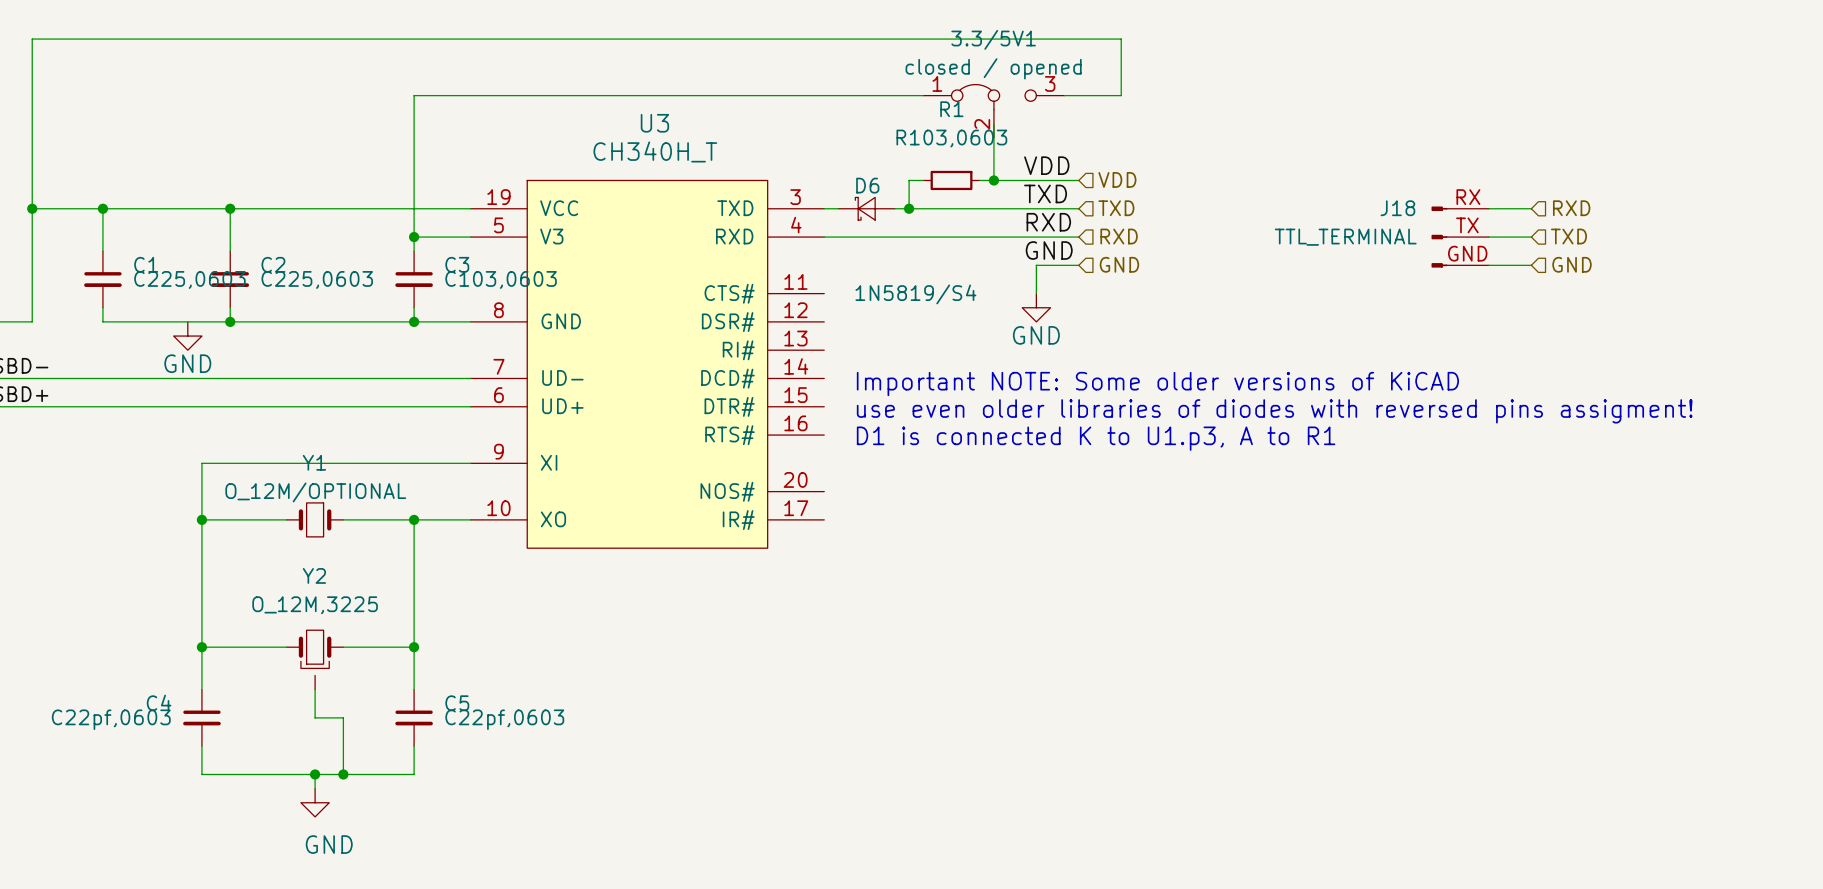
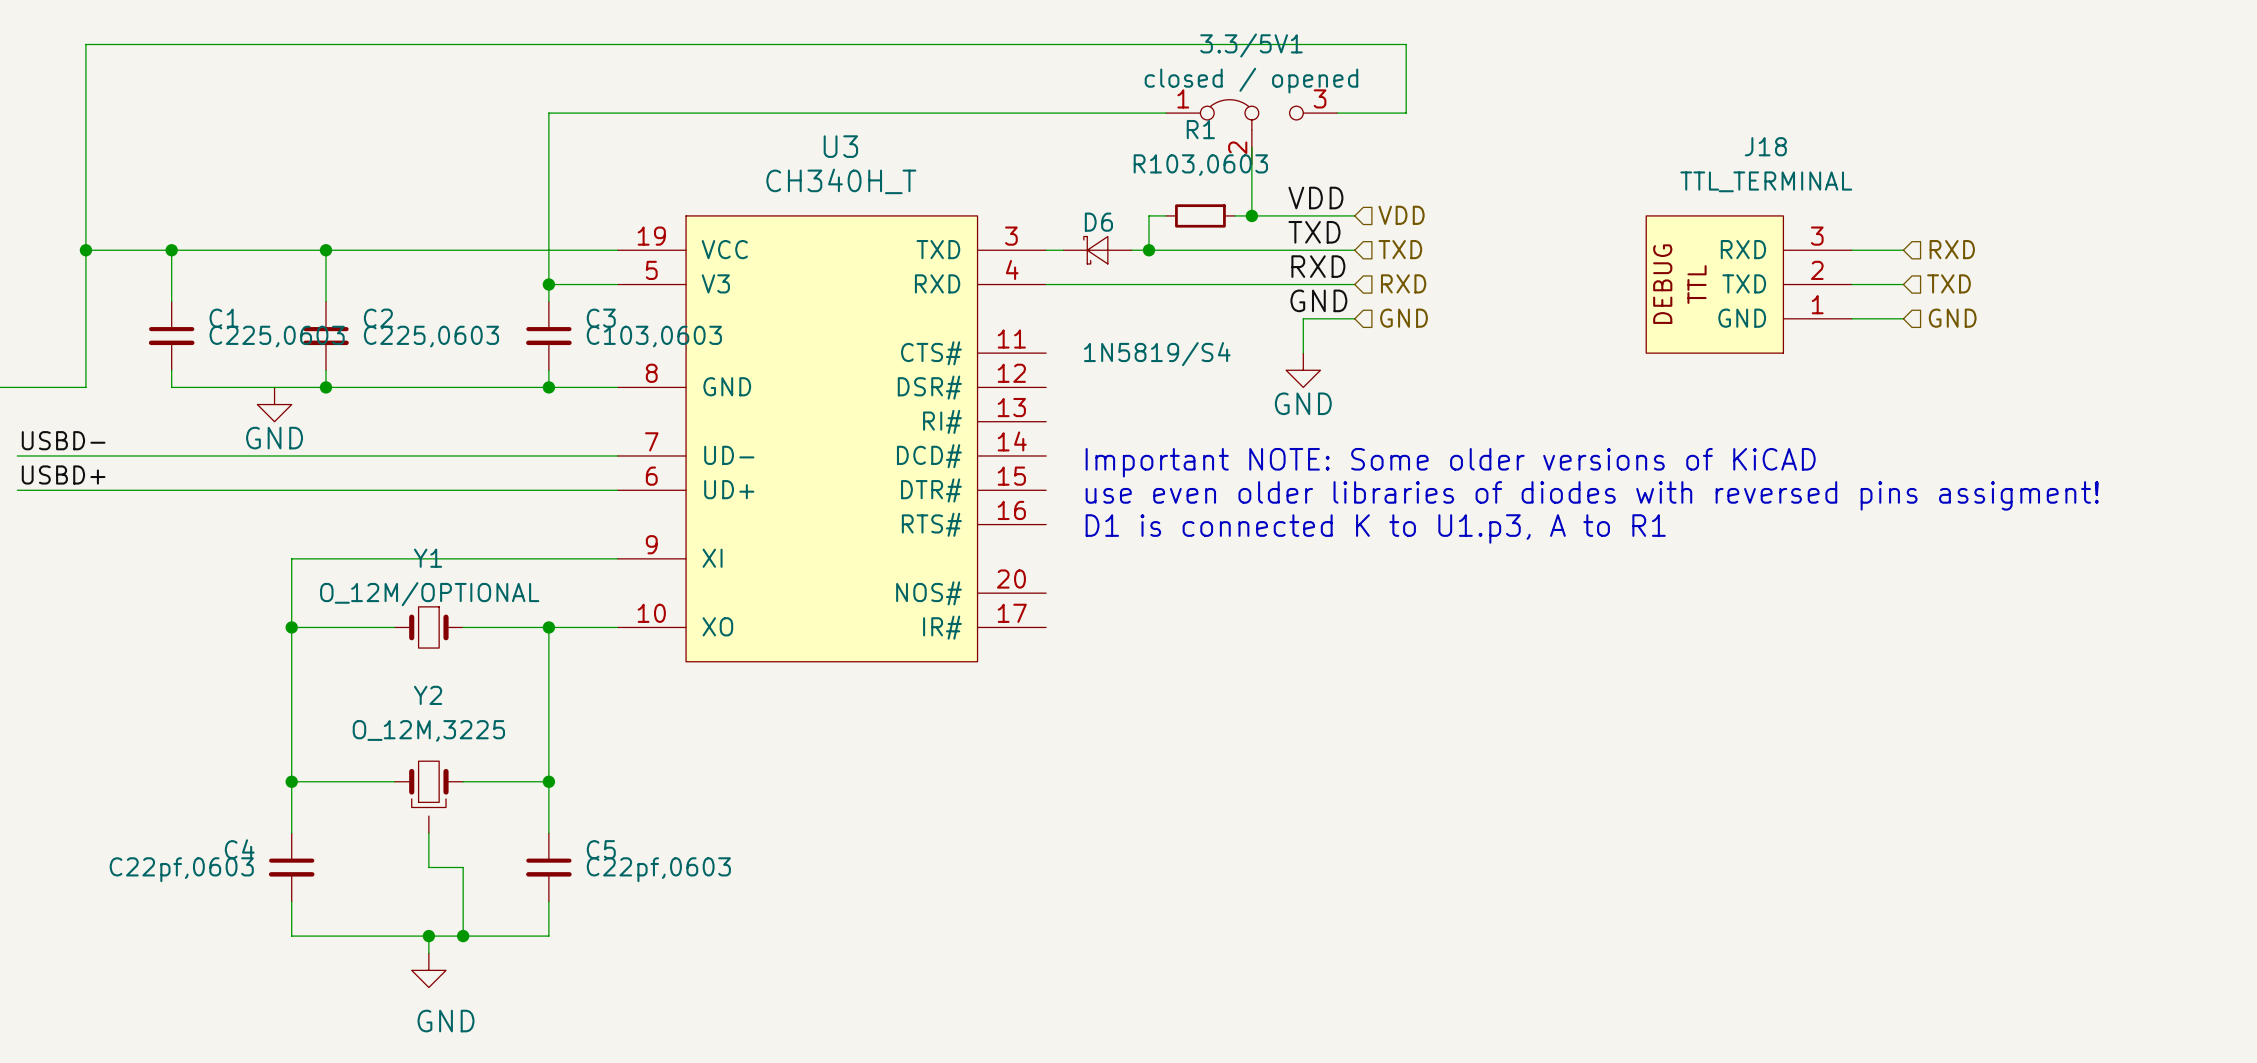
J18 symbol: [1431, 206, 1489, 268] -> [1646, 215, 1852, 354]
J18 name position: J18 (1397, 208) -> J18 (1765, 146)
J18 value position: TTL_TERMINAL (1345, 237) -> TTL_TERMINAL (1766, 181)

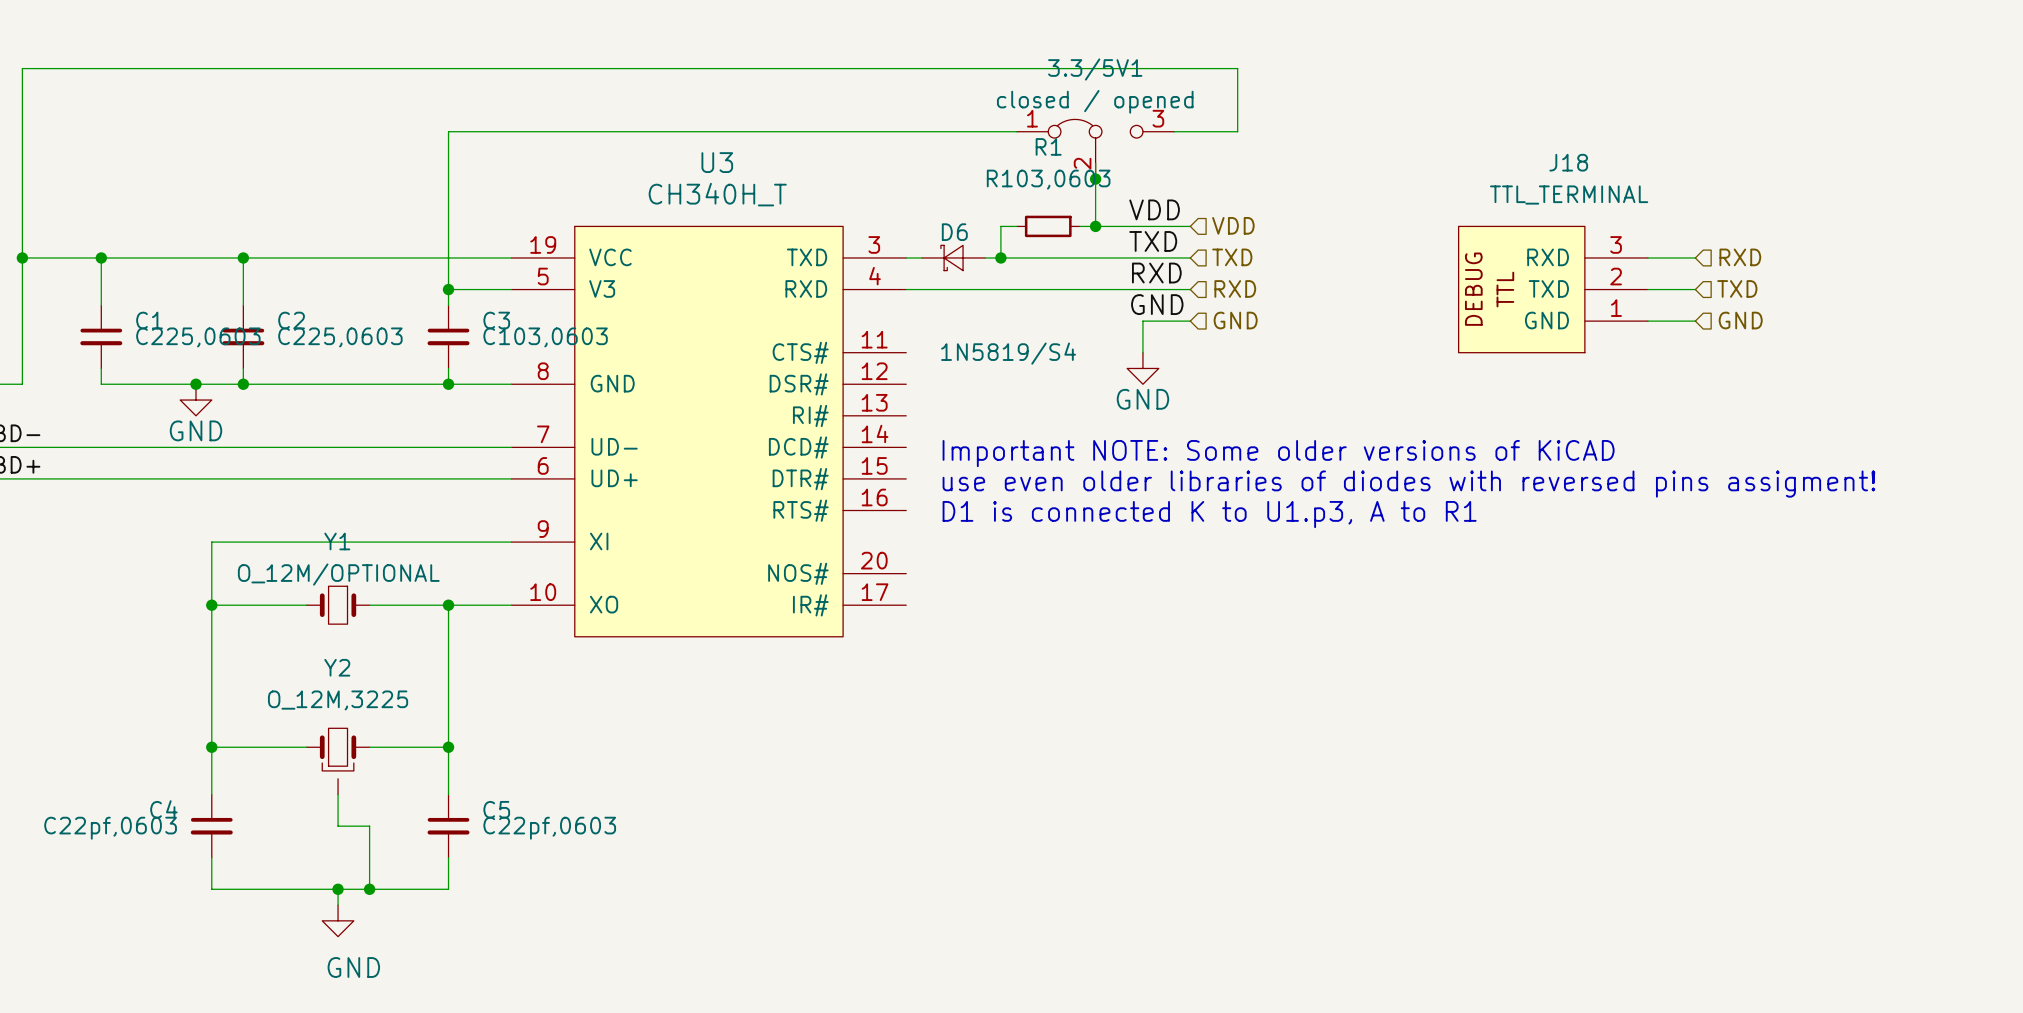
junction: none -> (1095, 179)
junction: none -> (195, 384)

